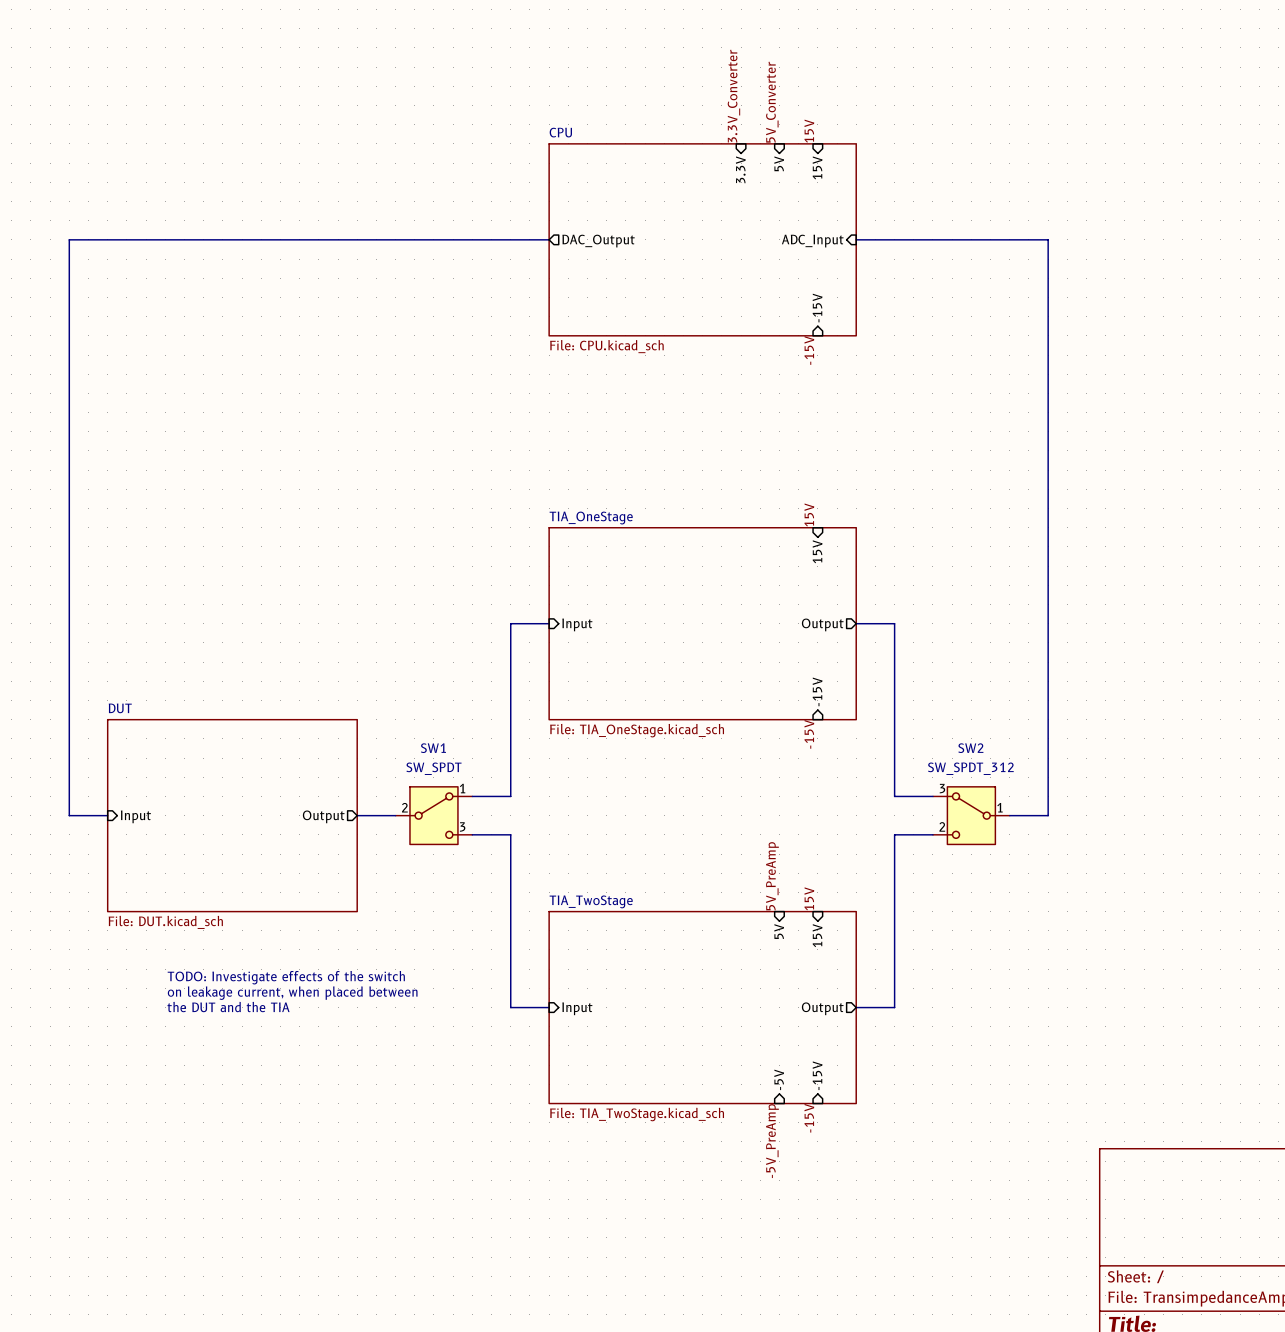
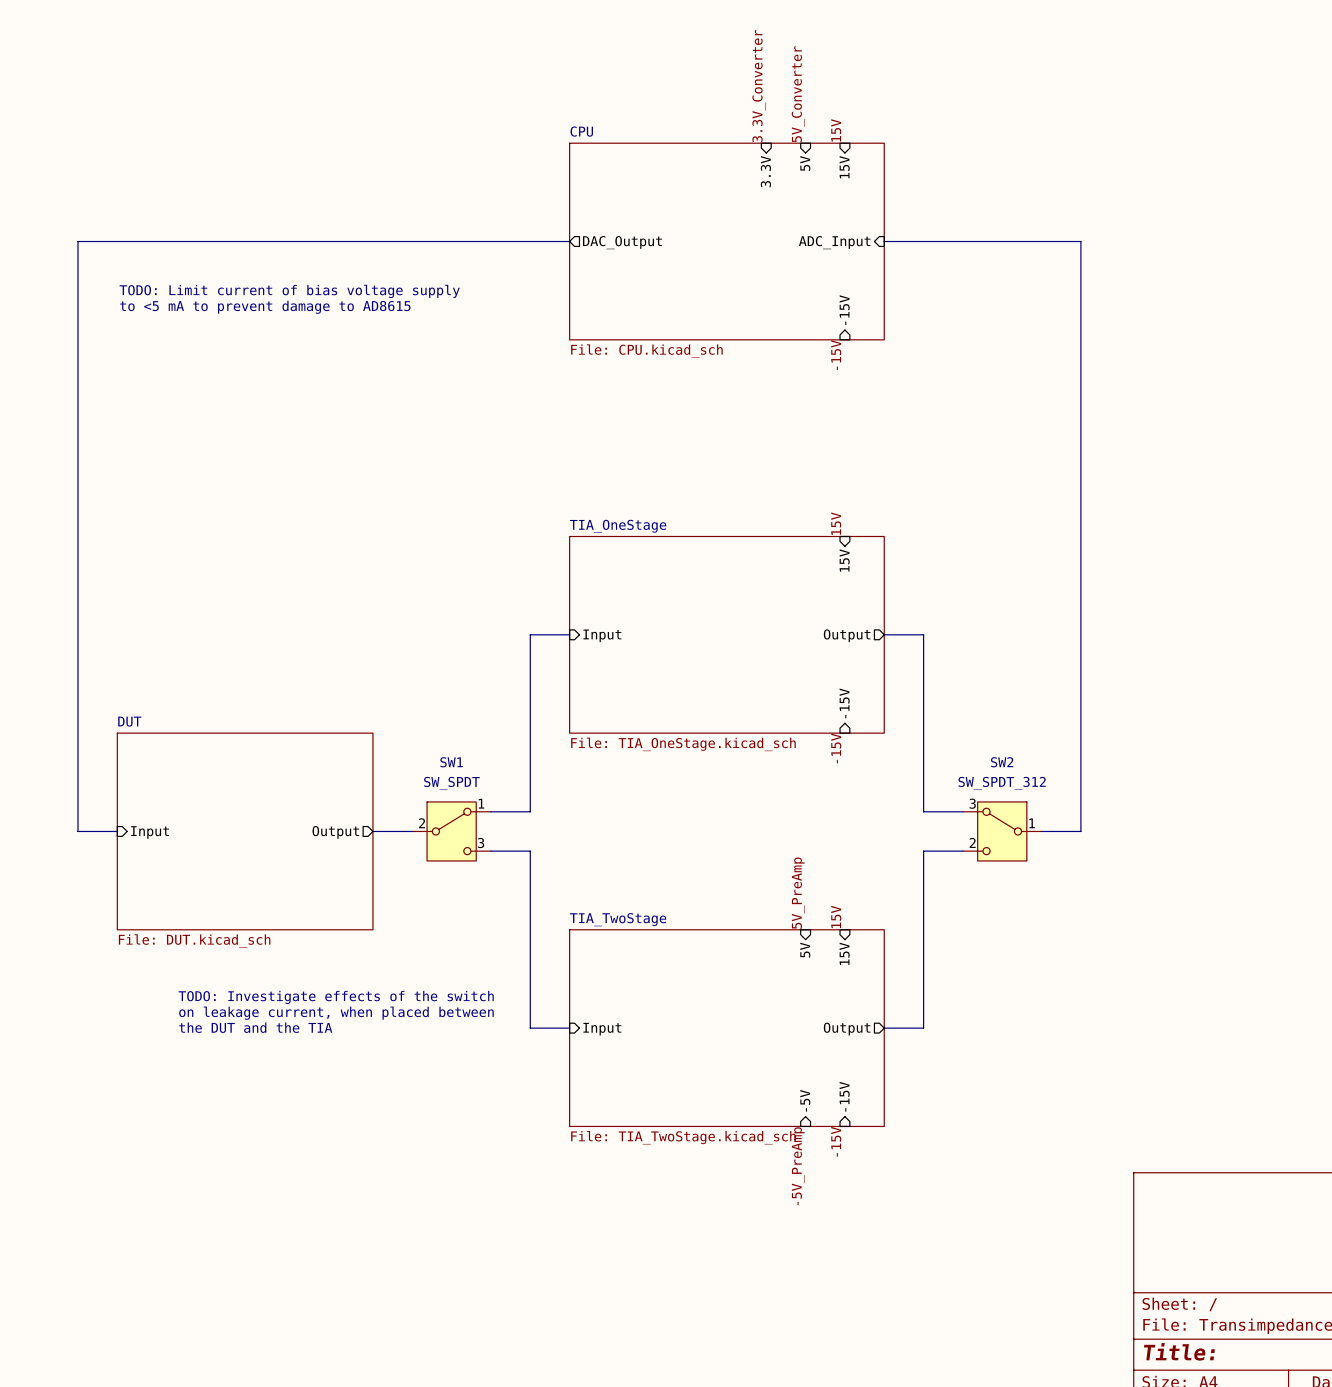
text: none -> TODO: Limit current of bias voltage supply (289, 291)
text: none -> to <5 mA to prevent damage to AD8615 (265, 307)

